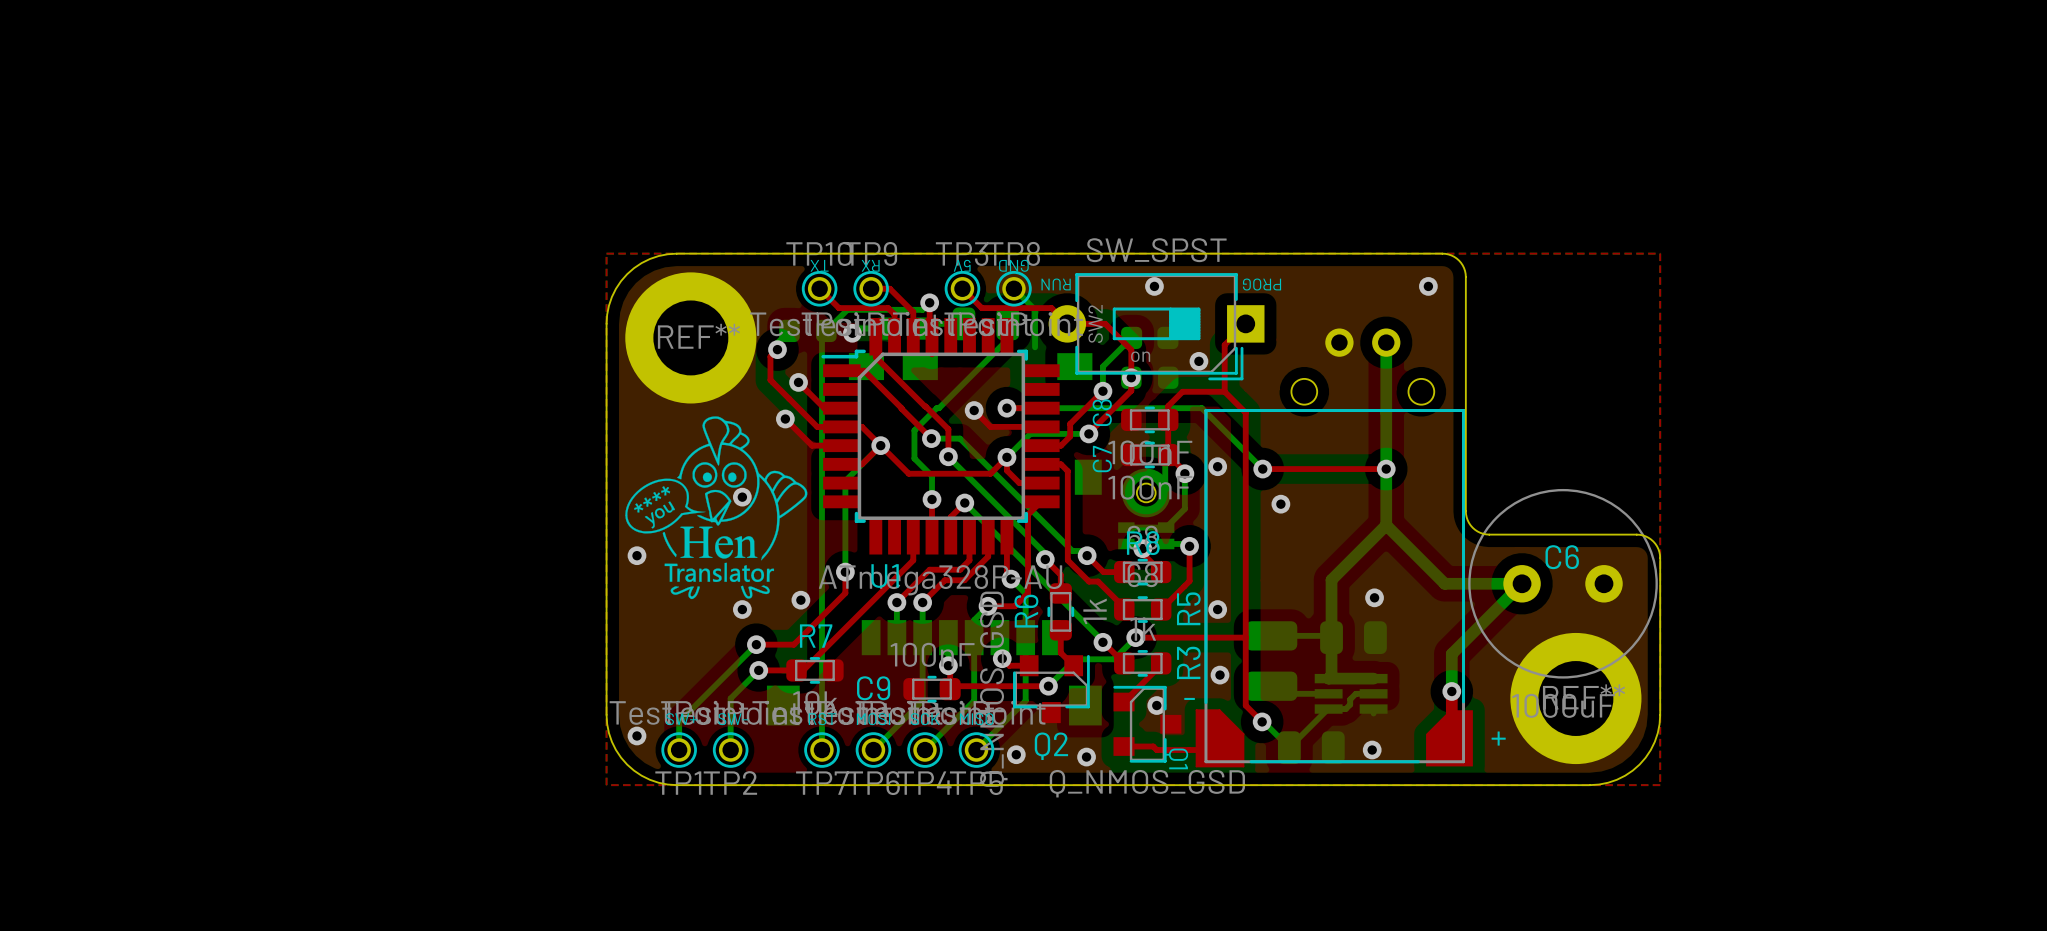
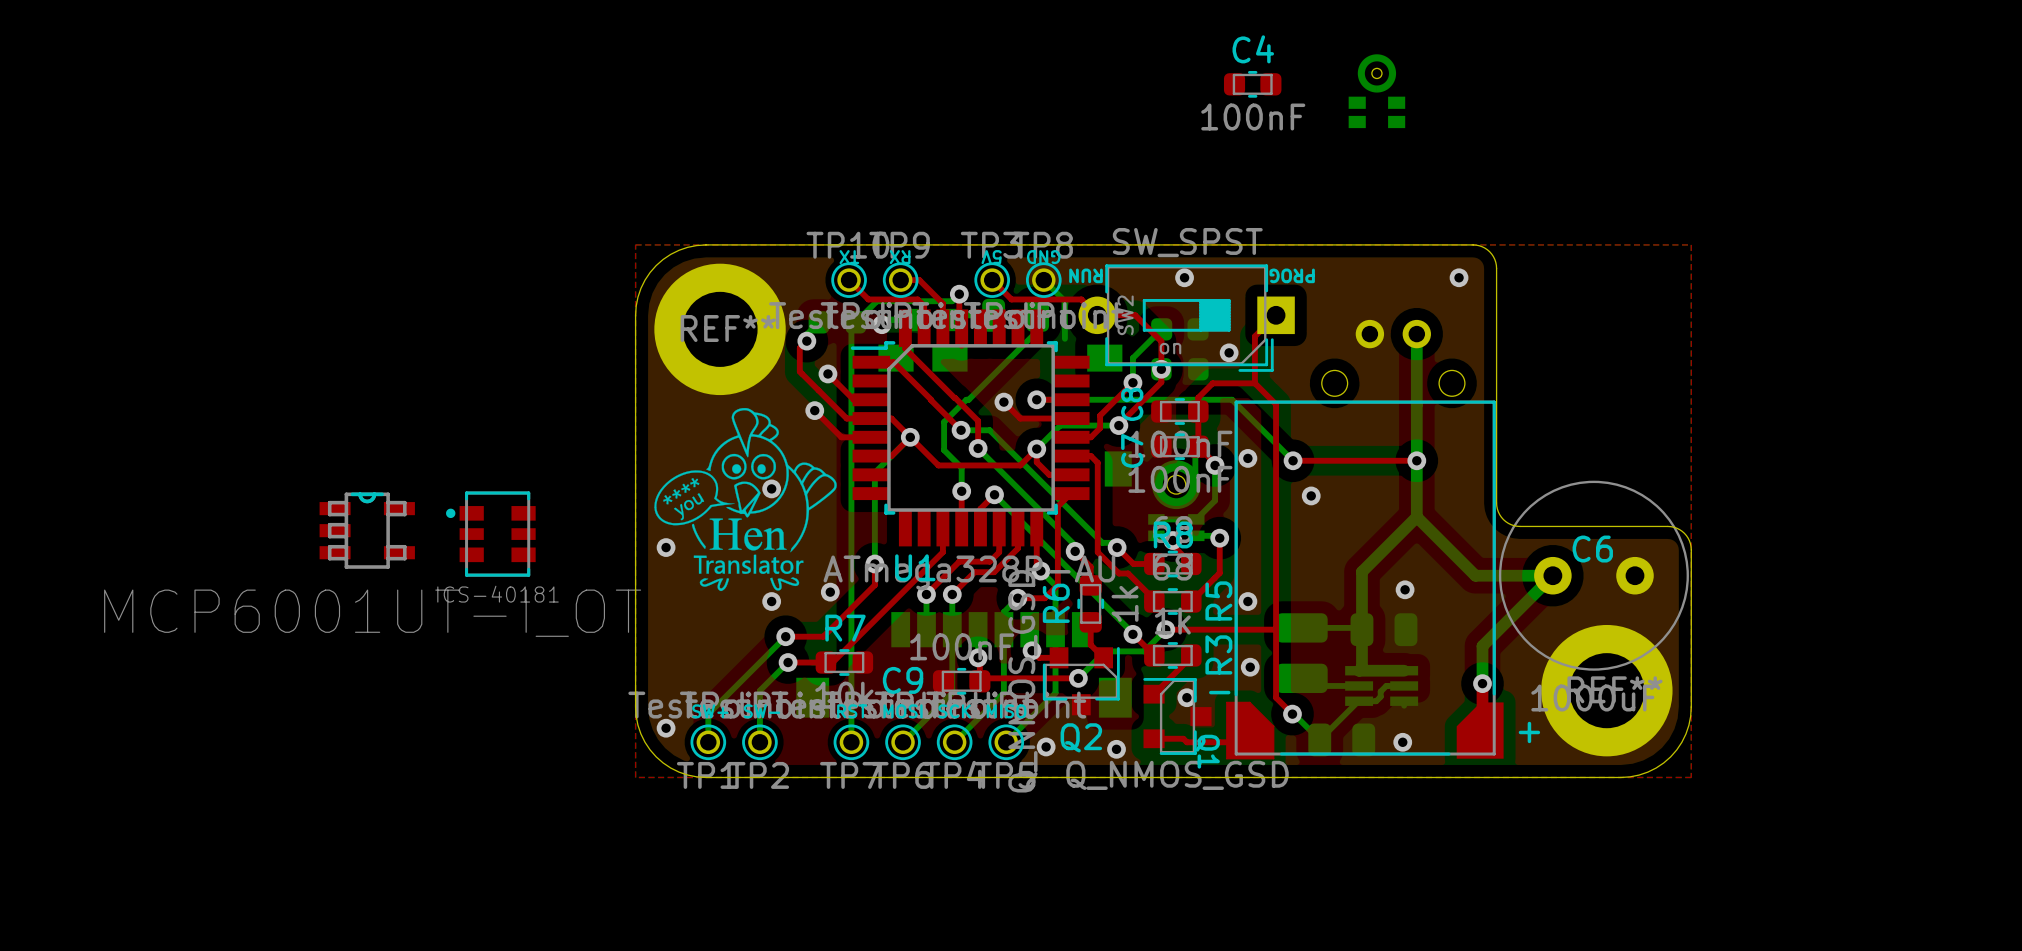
C4: none -> 100nF (1252, 84)
part: none -> (1376, 91)
part: none -> MCP6001UT-I_OT (367, 530)
part: none -> ICS-40181 (490, 534)

